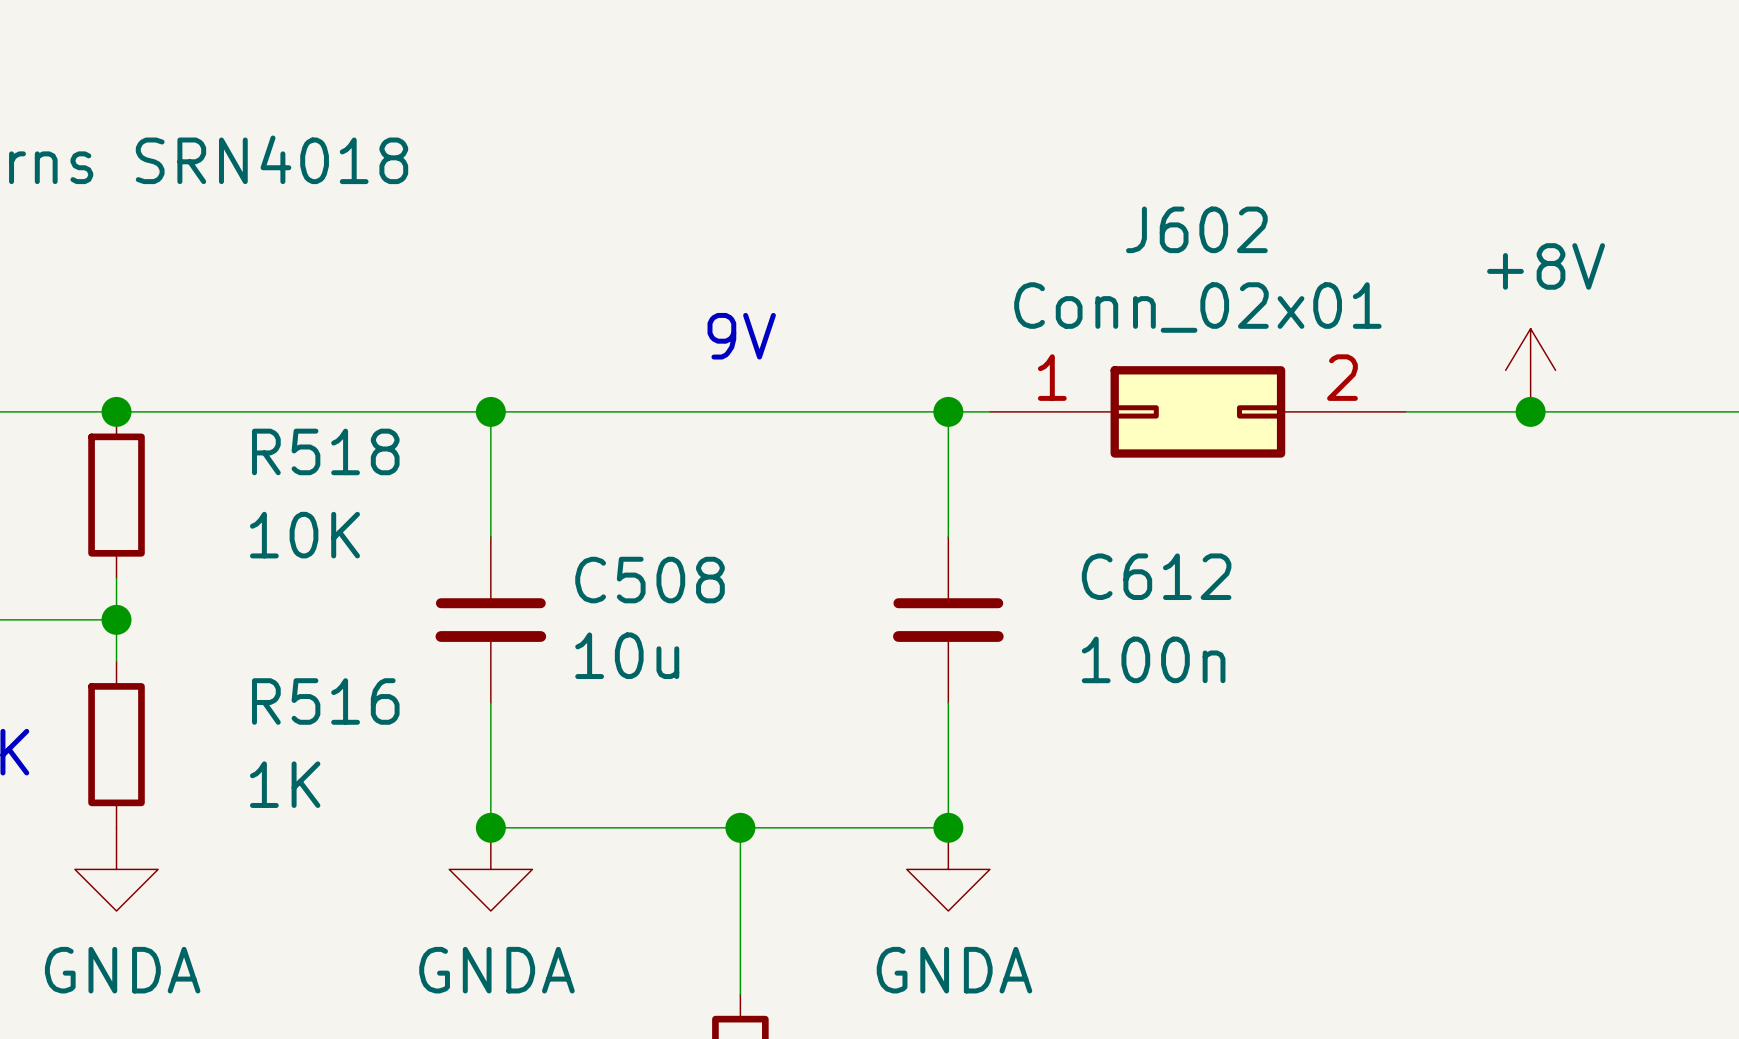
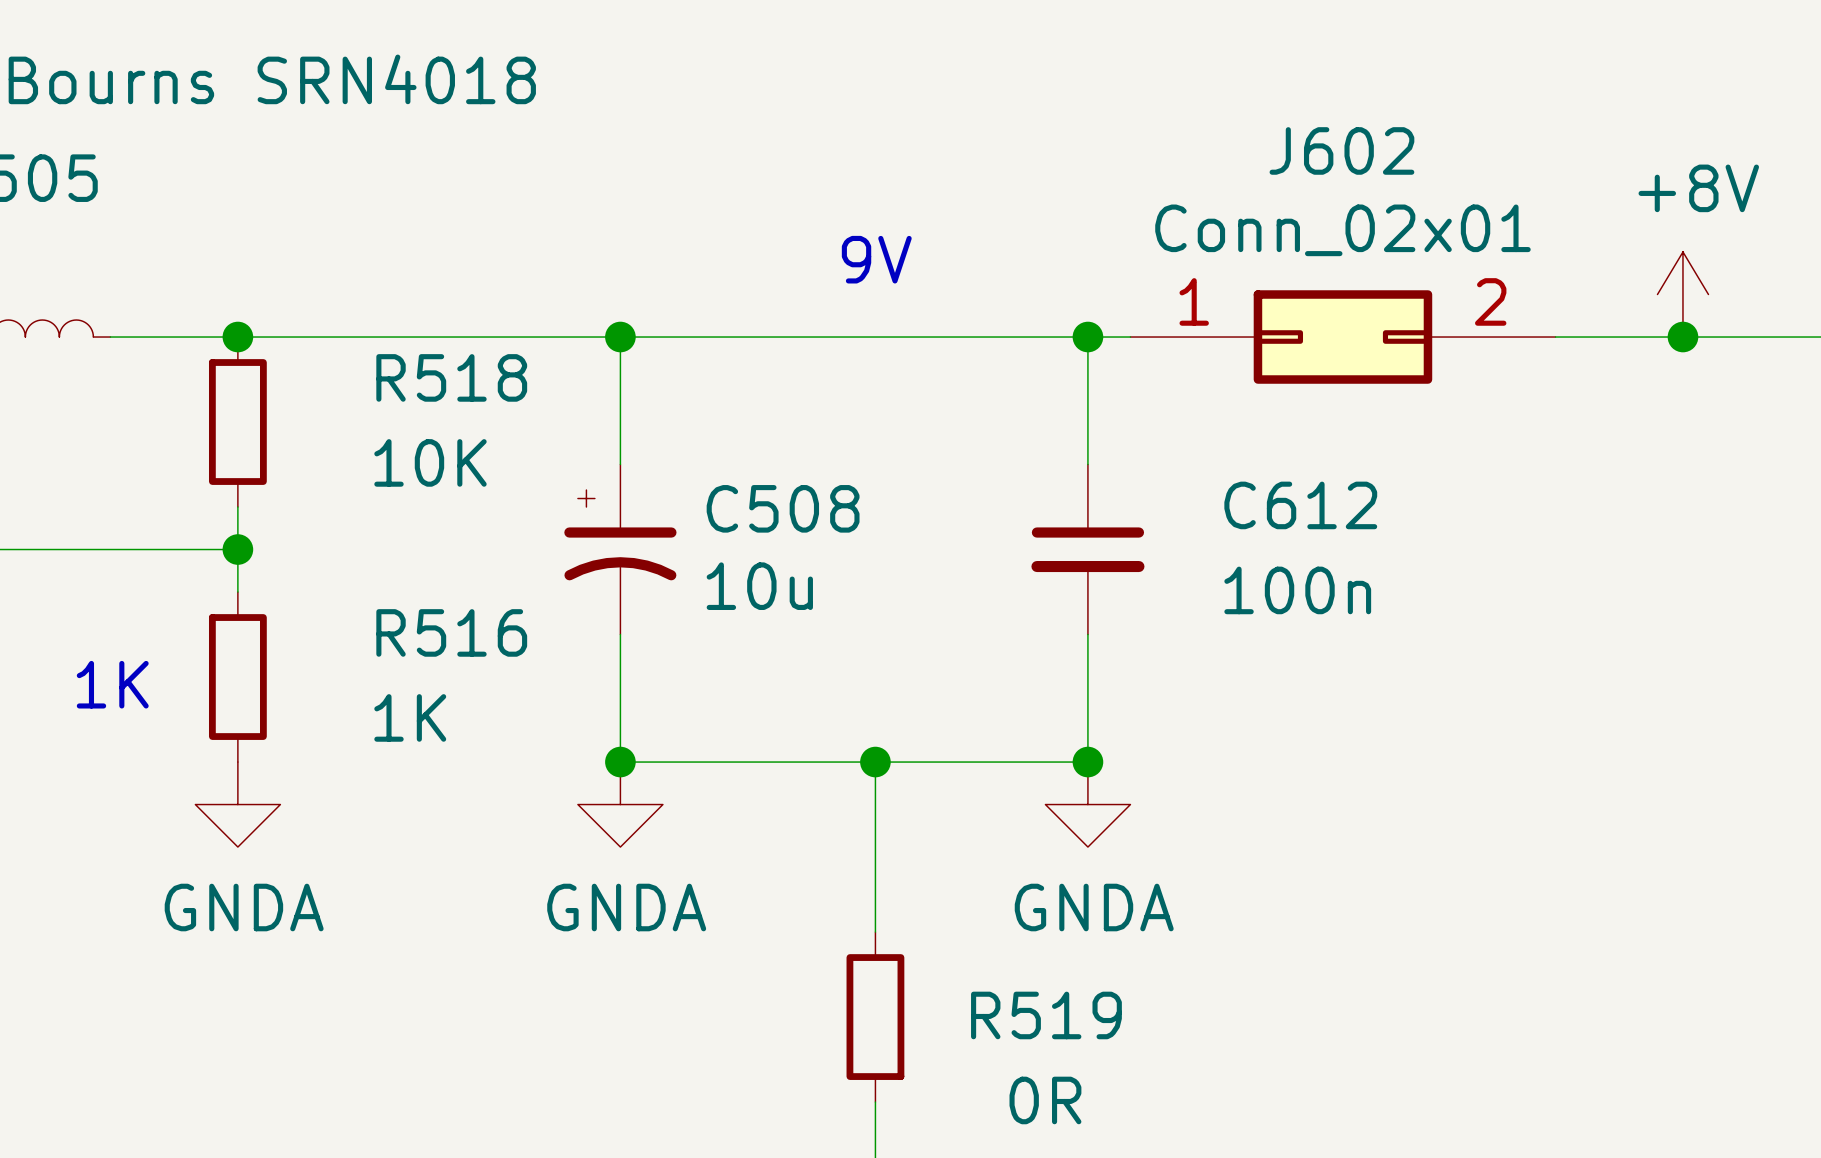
C508 symbol: [435, 536, 547, 704] -> [564, 464, 677, 635]

